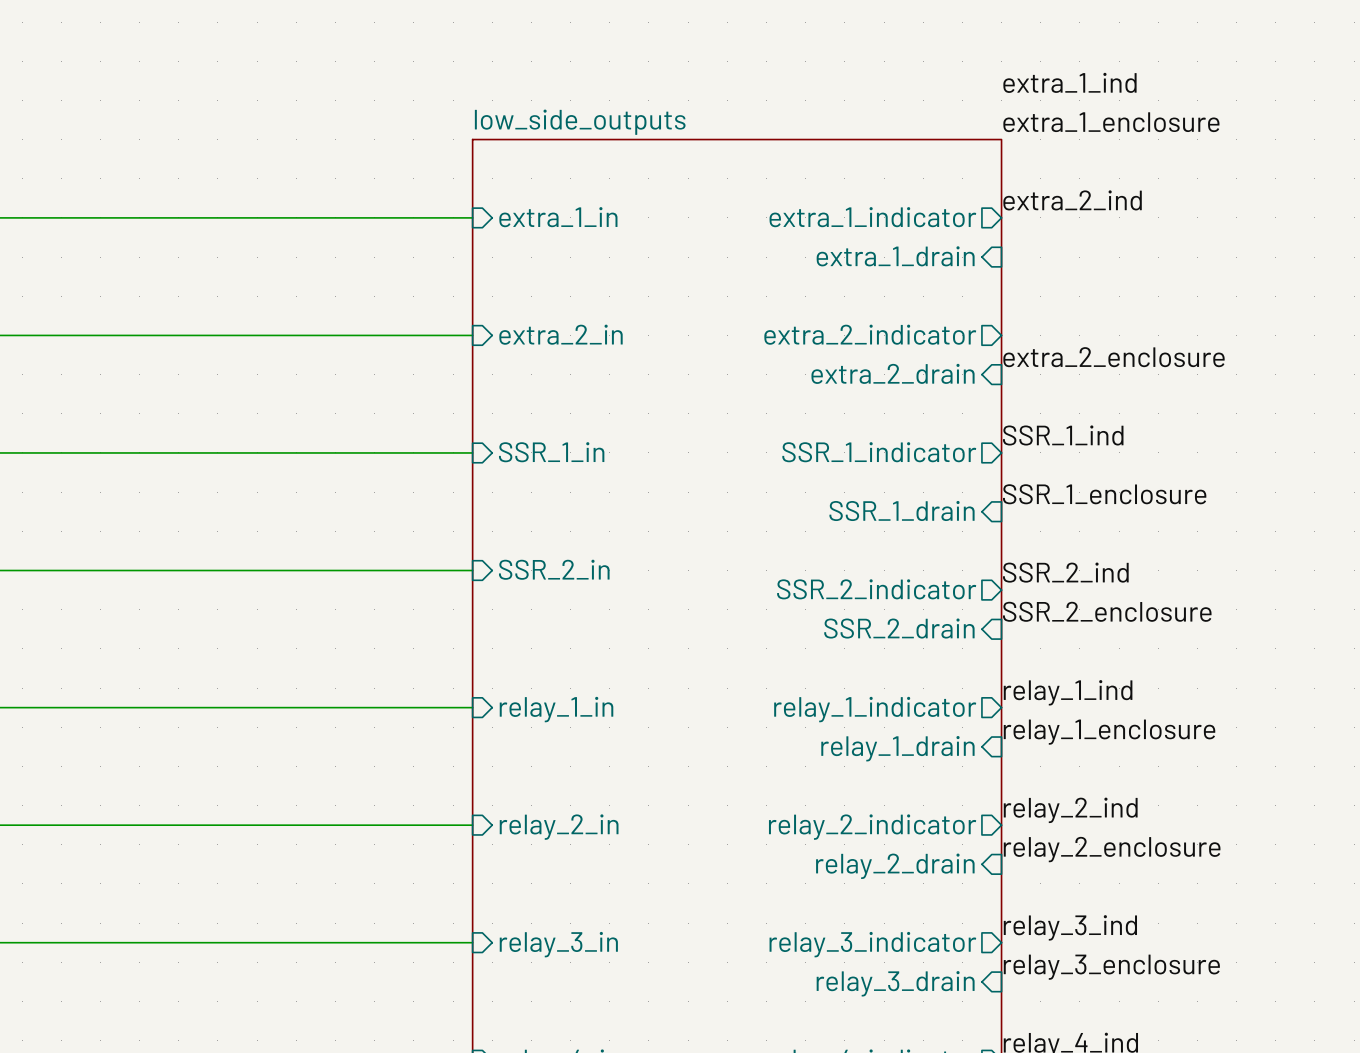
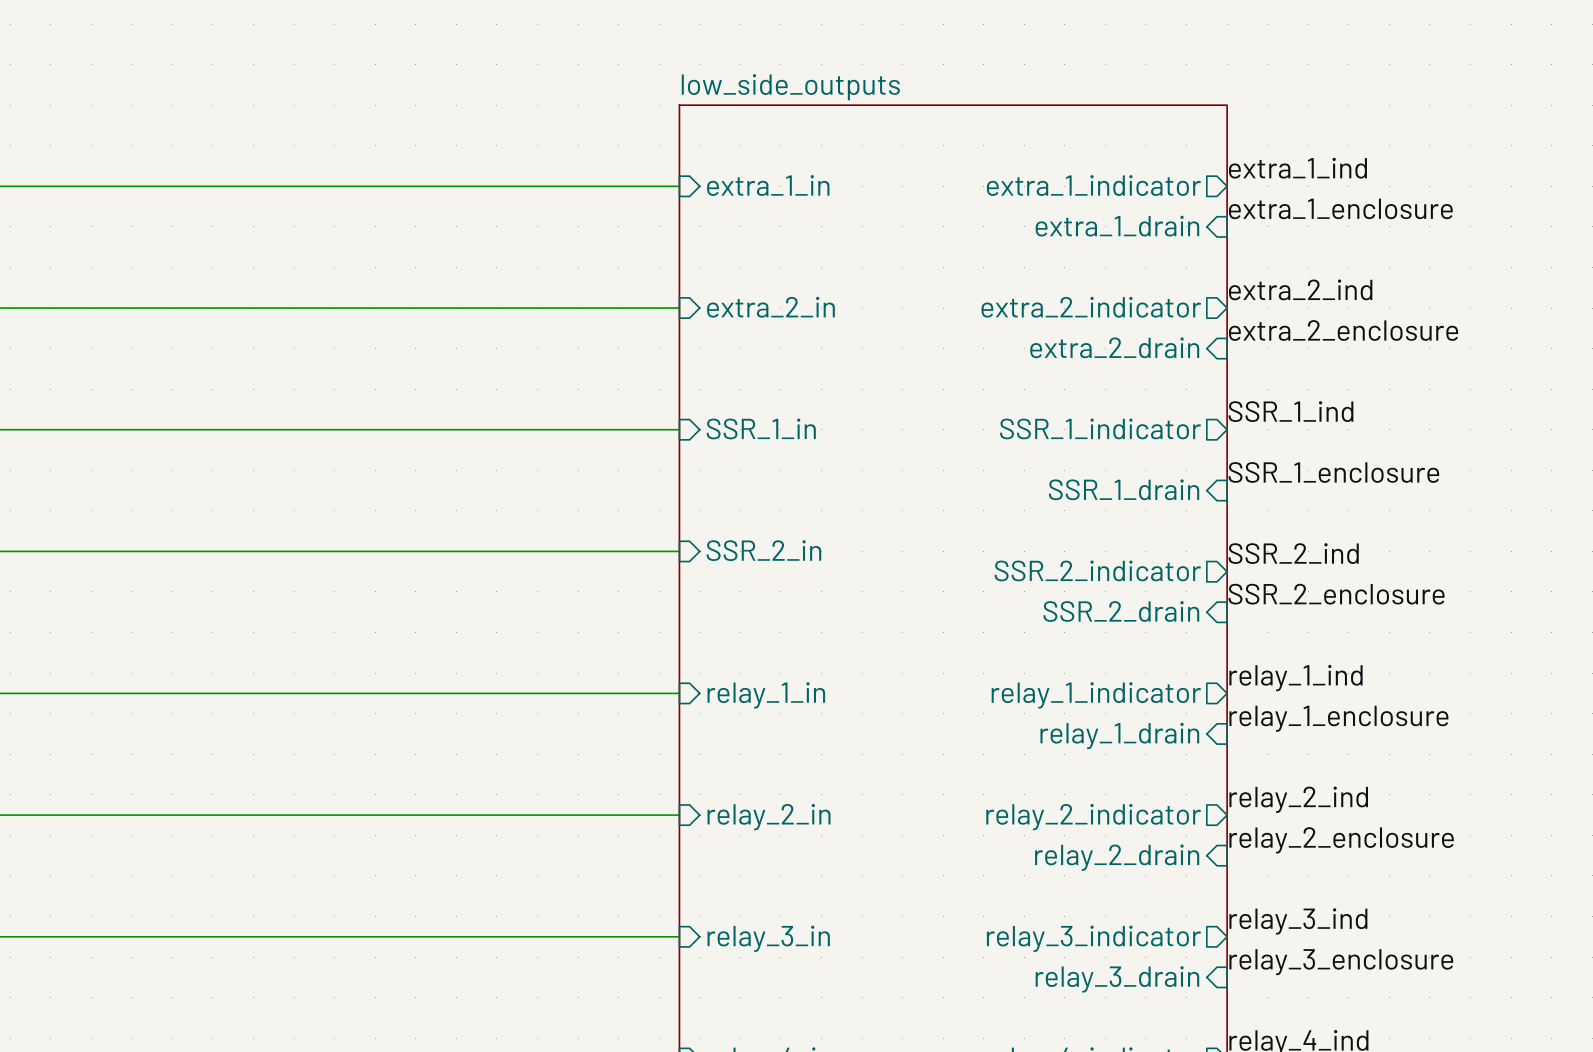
label: extra_1_ind (1069, 82) -> none
label position: extra_1_enclosure (1111, 122) -> extra_1_enclosure (1340, 208)
label: extra_2_ind (1072, 200) -> extra_1_ind (1297, 168)
label: none -> extra_2_ind (1300, 289)

